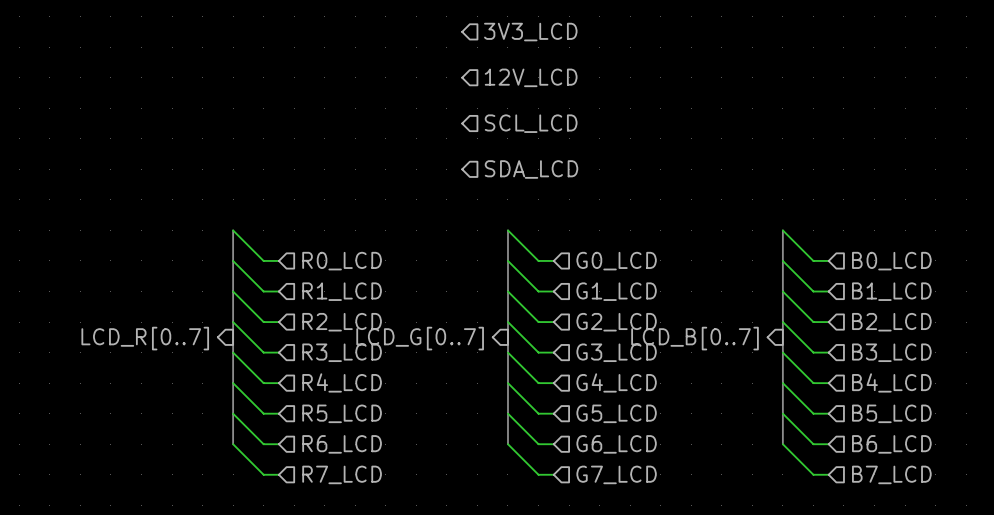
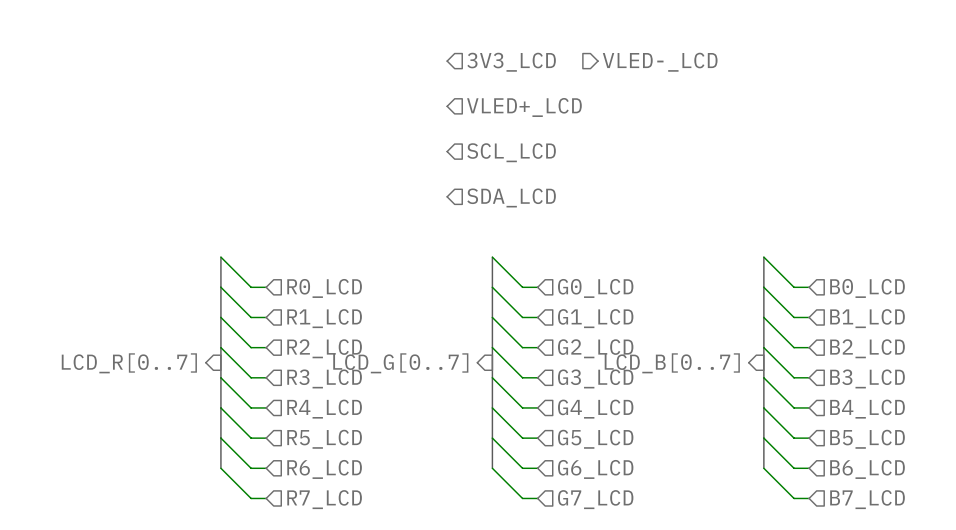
hierarchical label: none -> VLED-_LCD (660, 62)
hierarchical label: 12V_LCD (531, 77) -> VLED+_LCD (524, 107)

